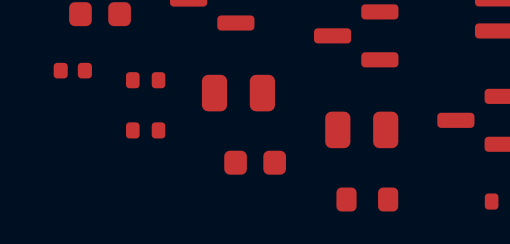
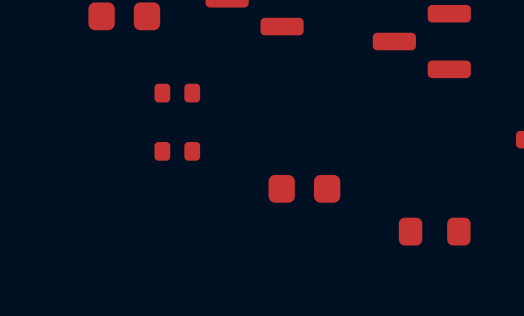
part: (72, 70) -> none
part: (238, 93) -> none
part: (361, 129) -> none

